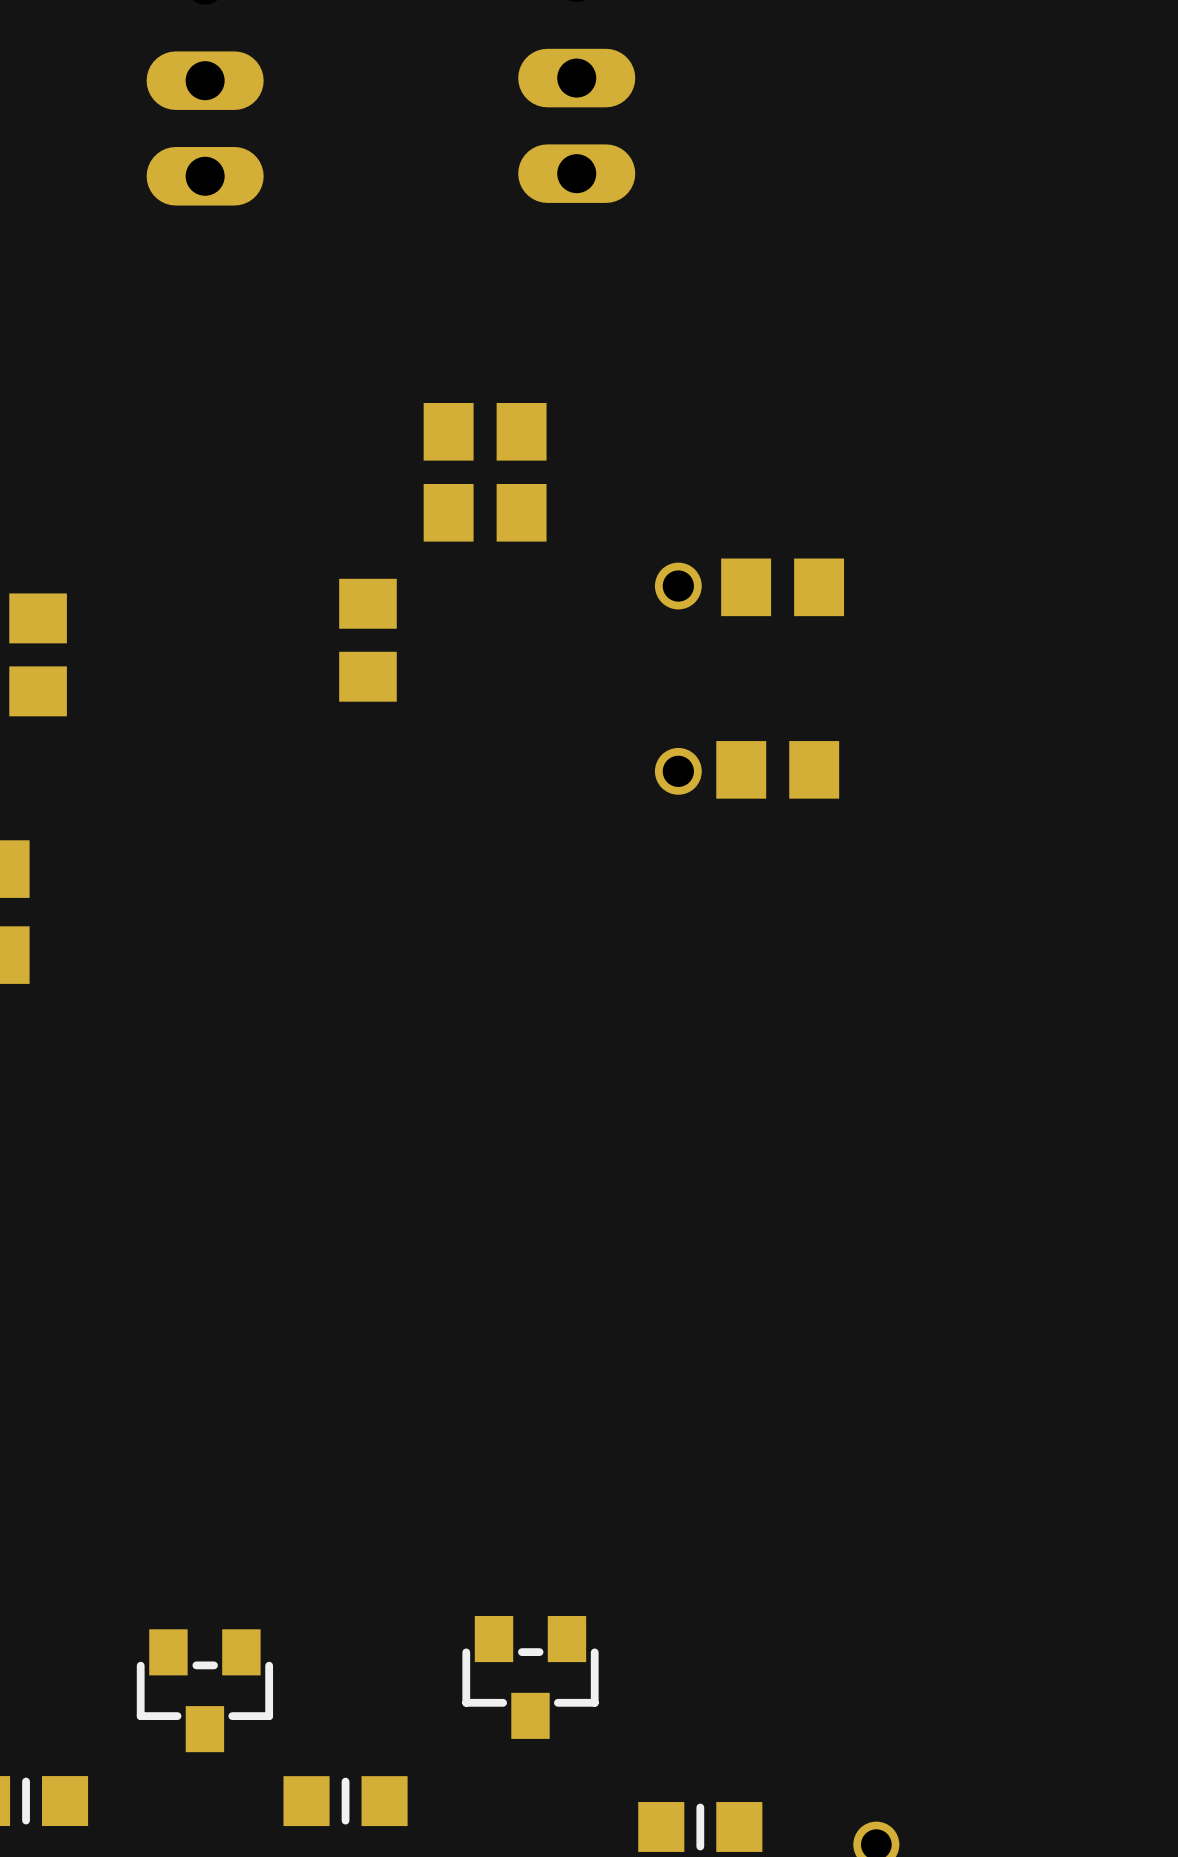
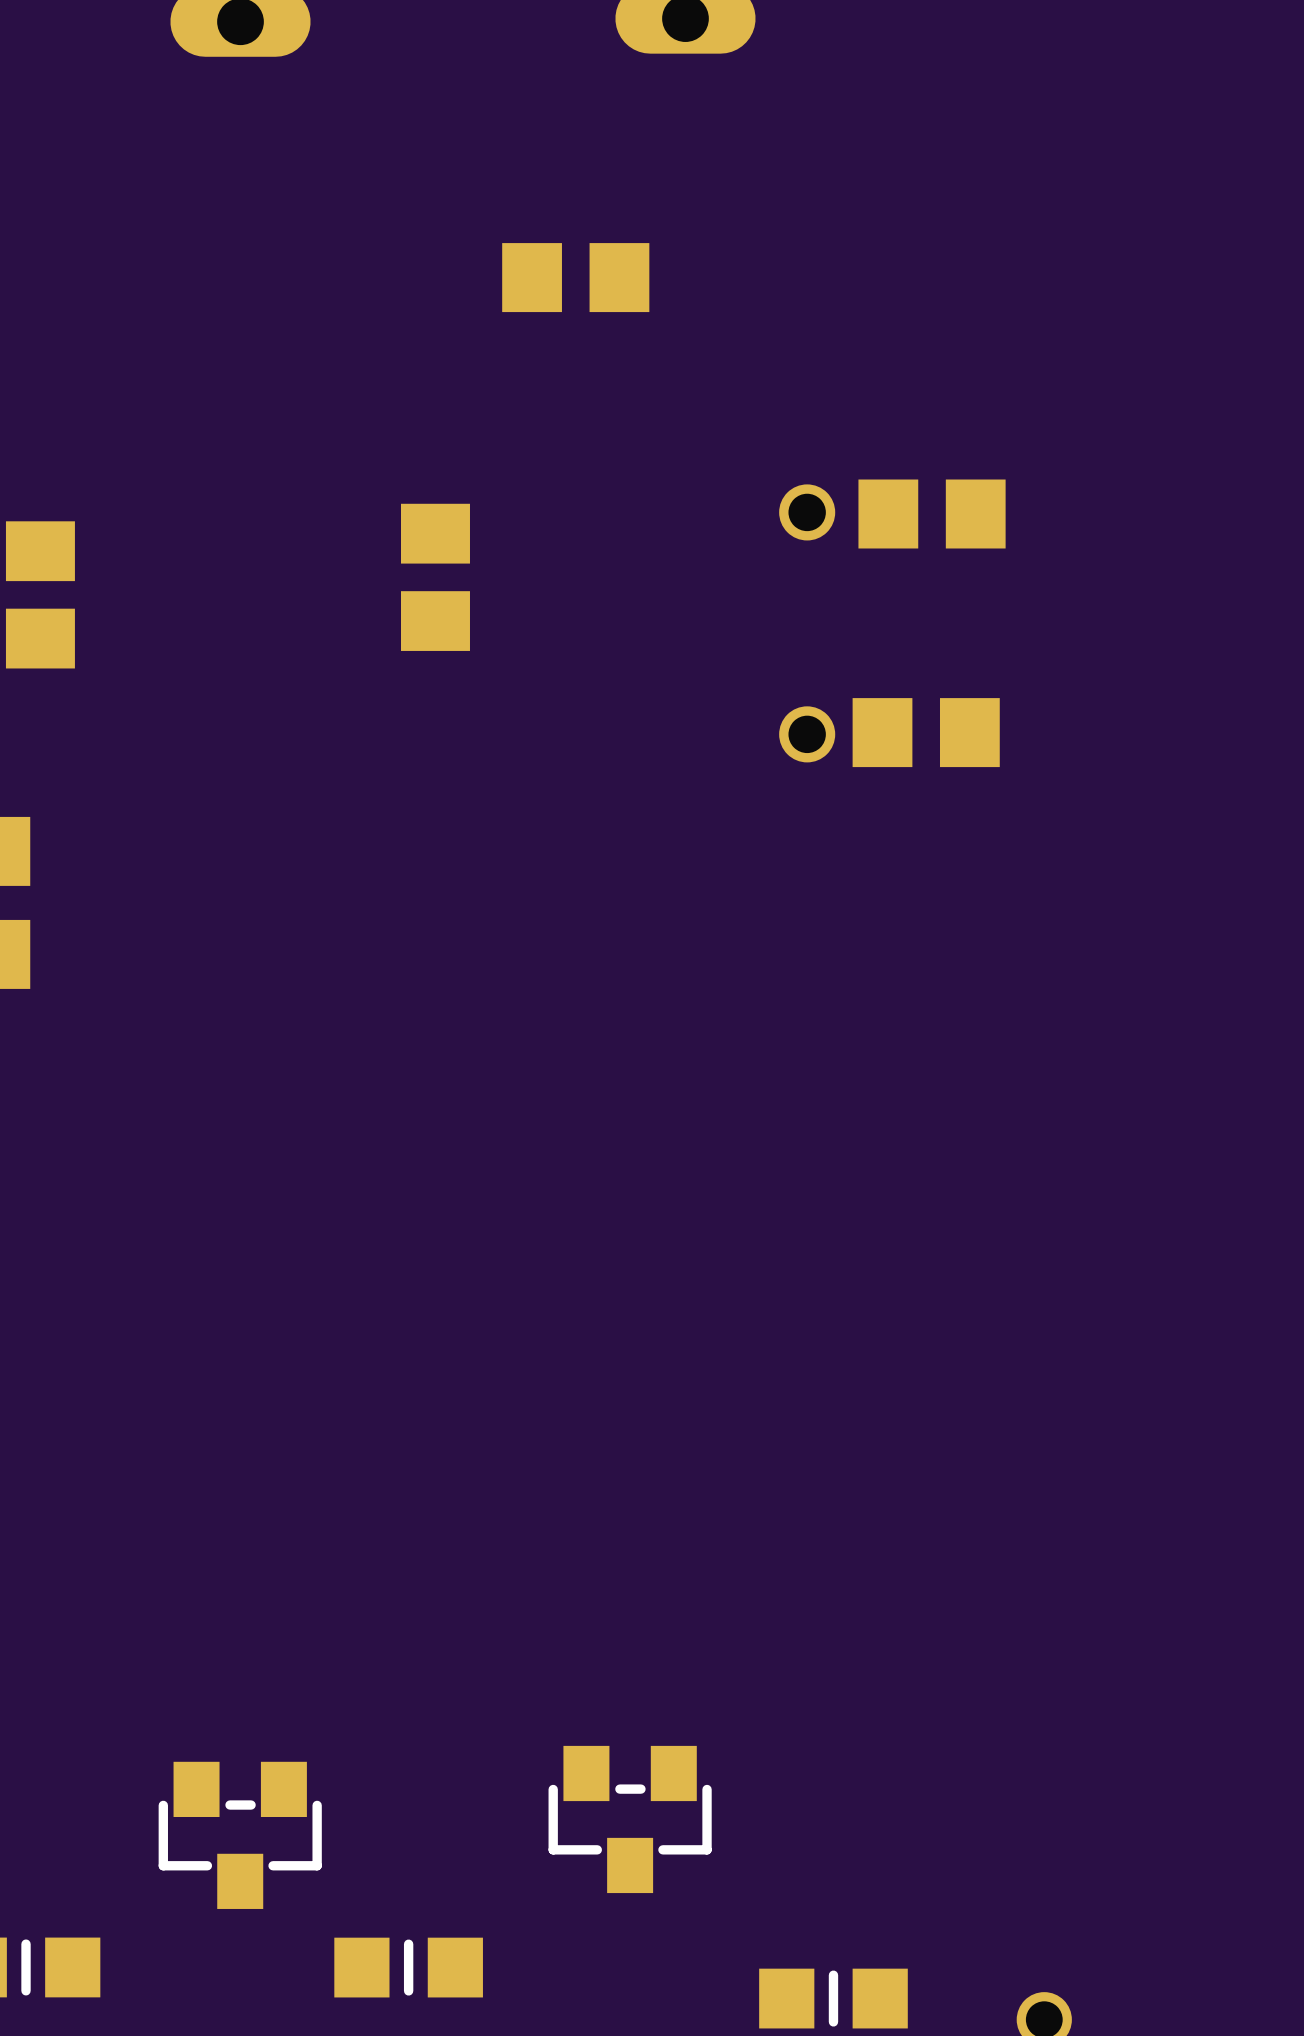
part position: (485, 431) -> (575, 277)
part: (485, 512) -> none

